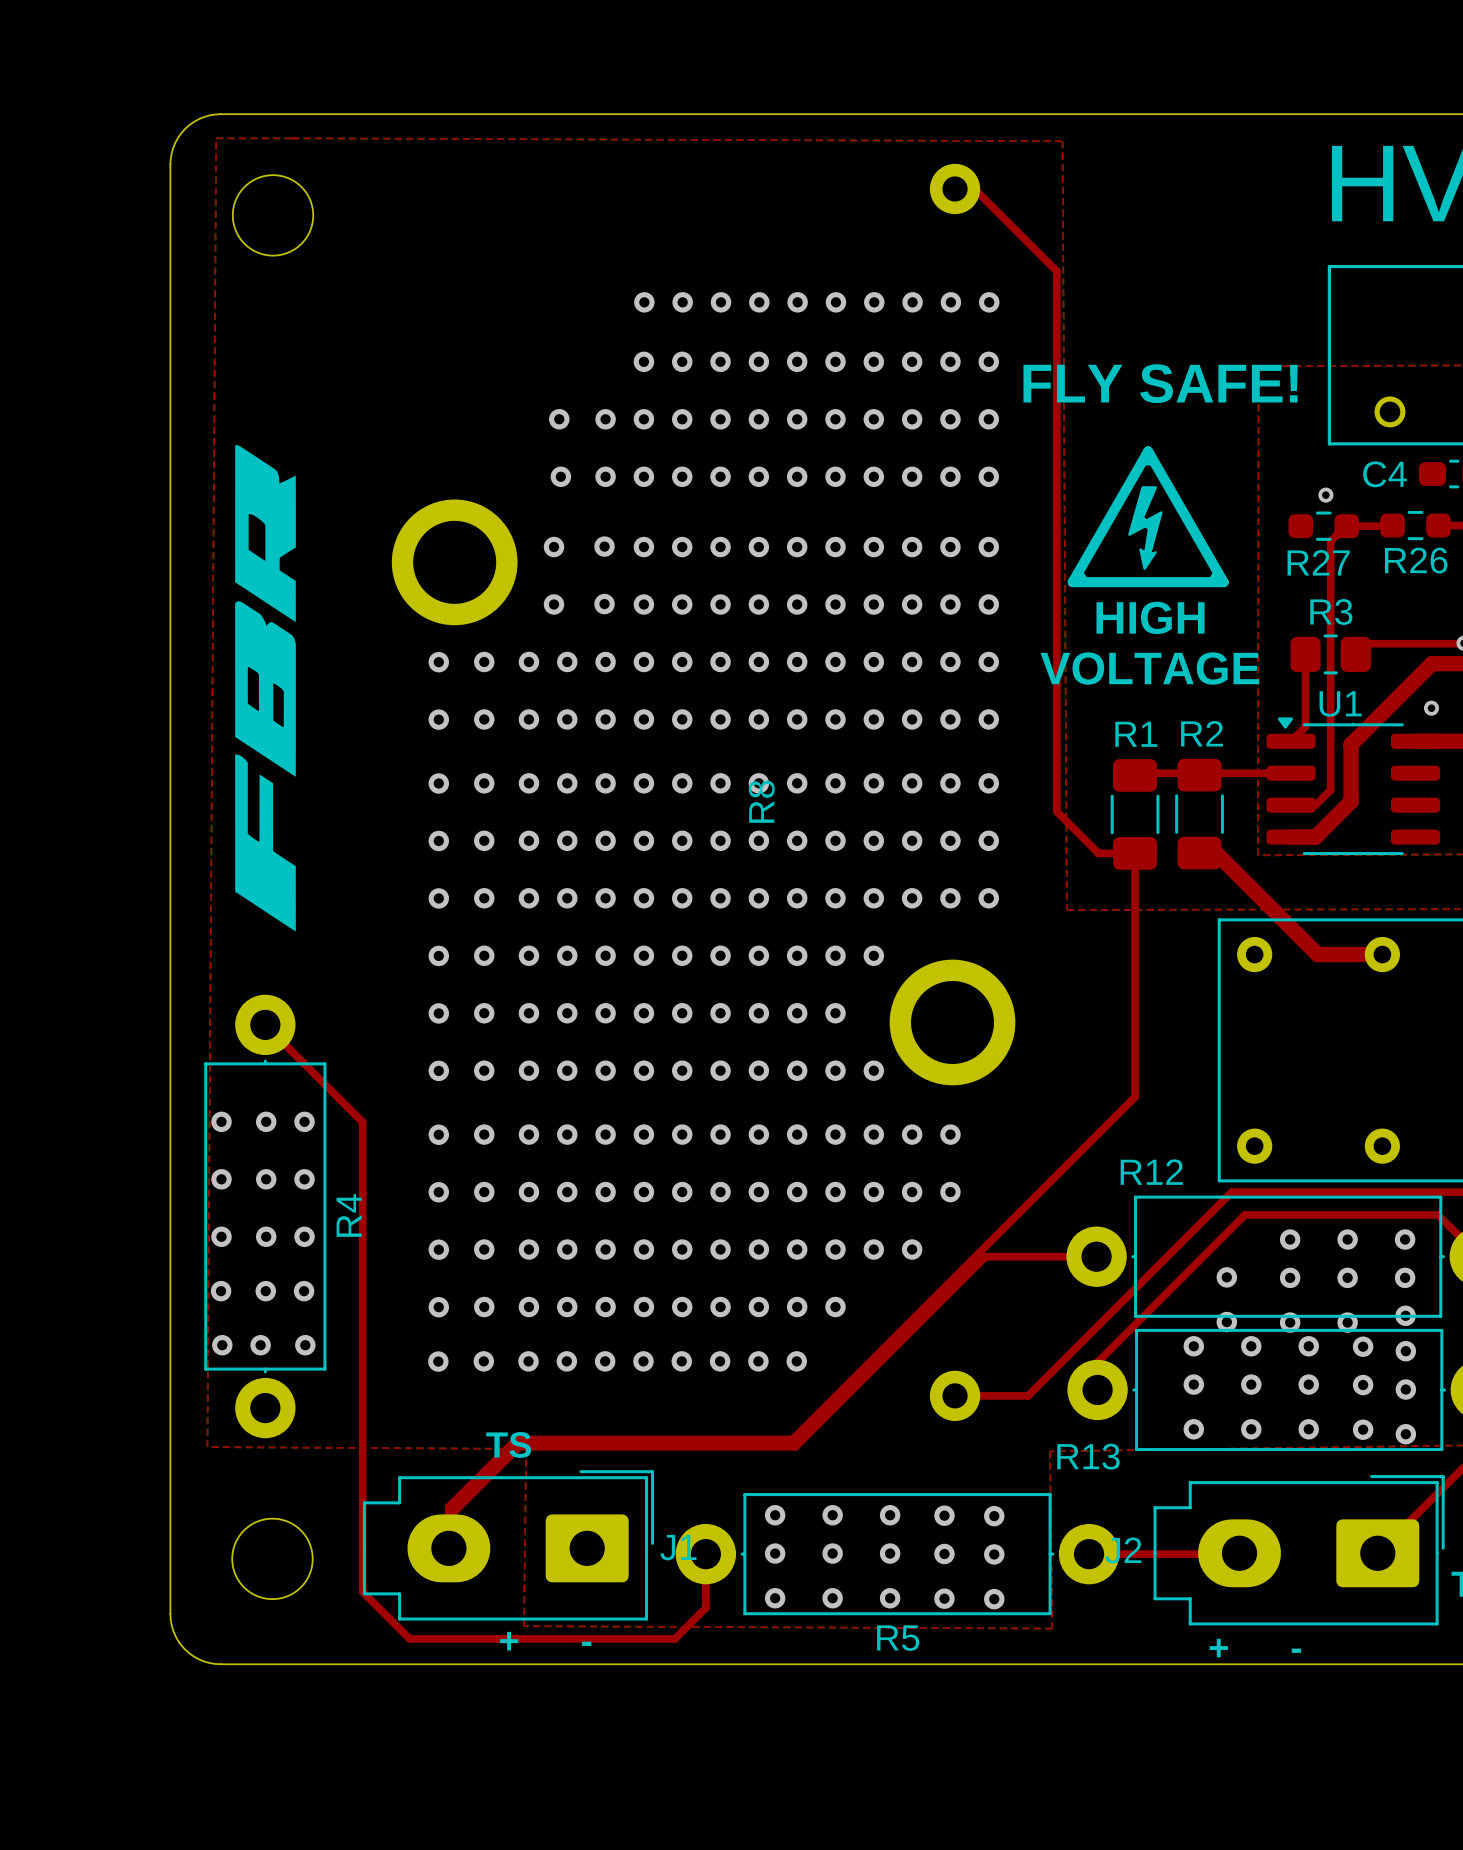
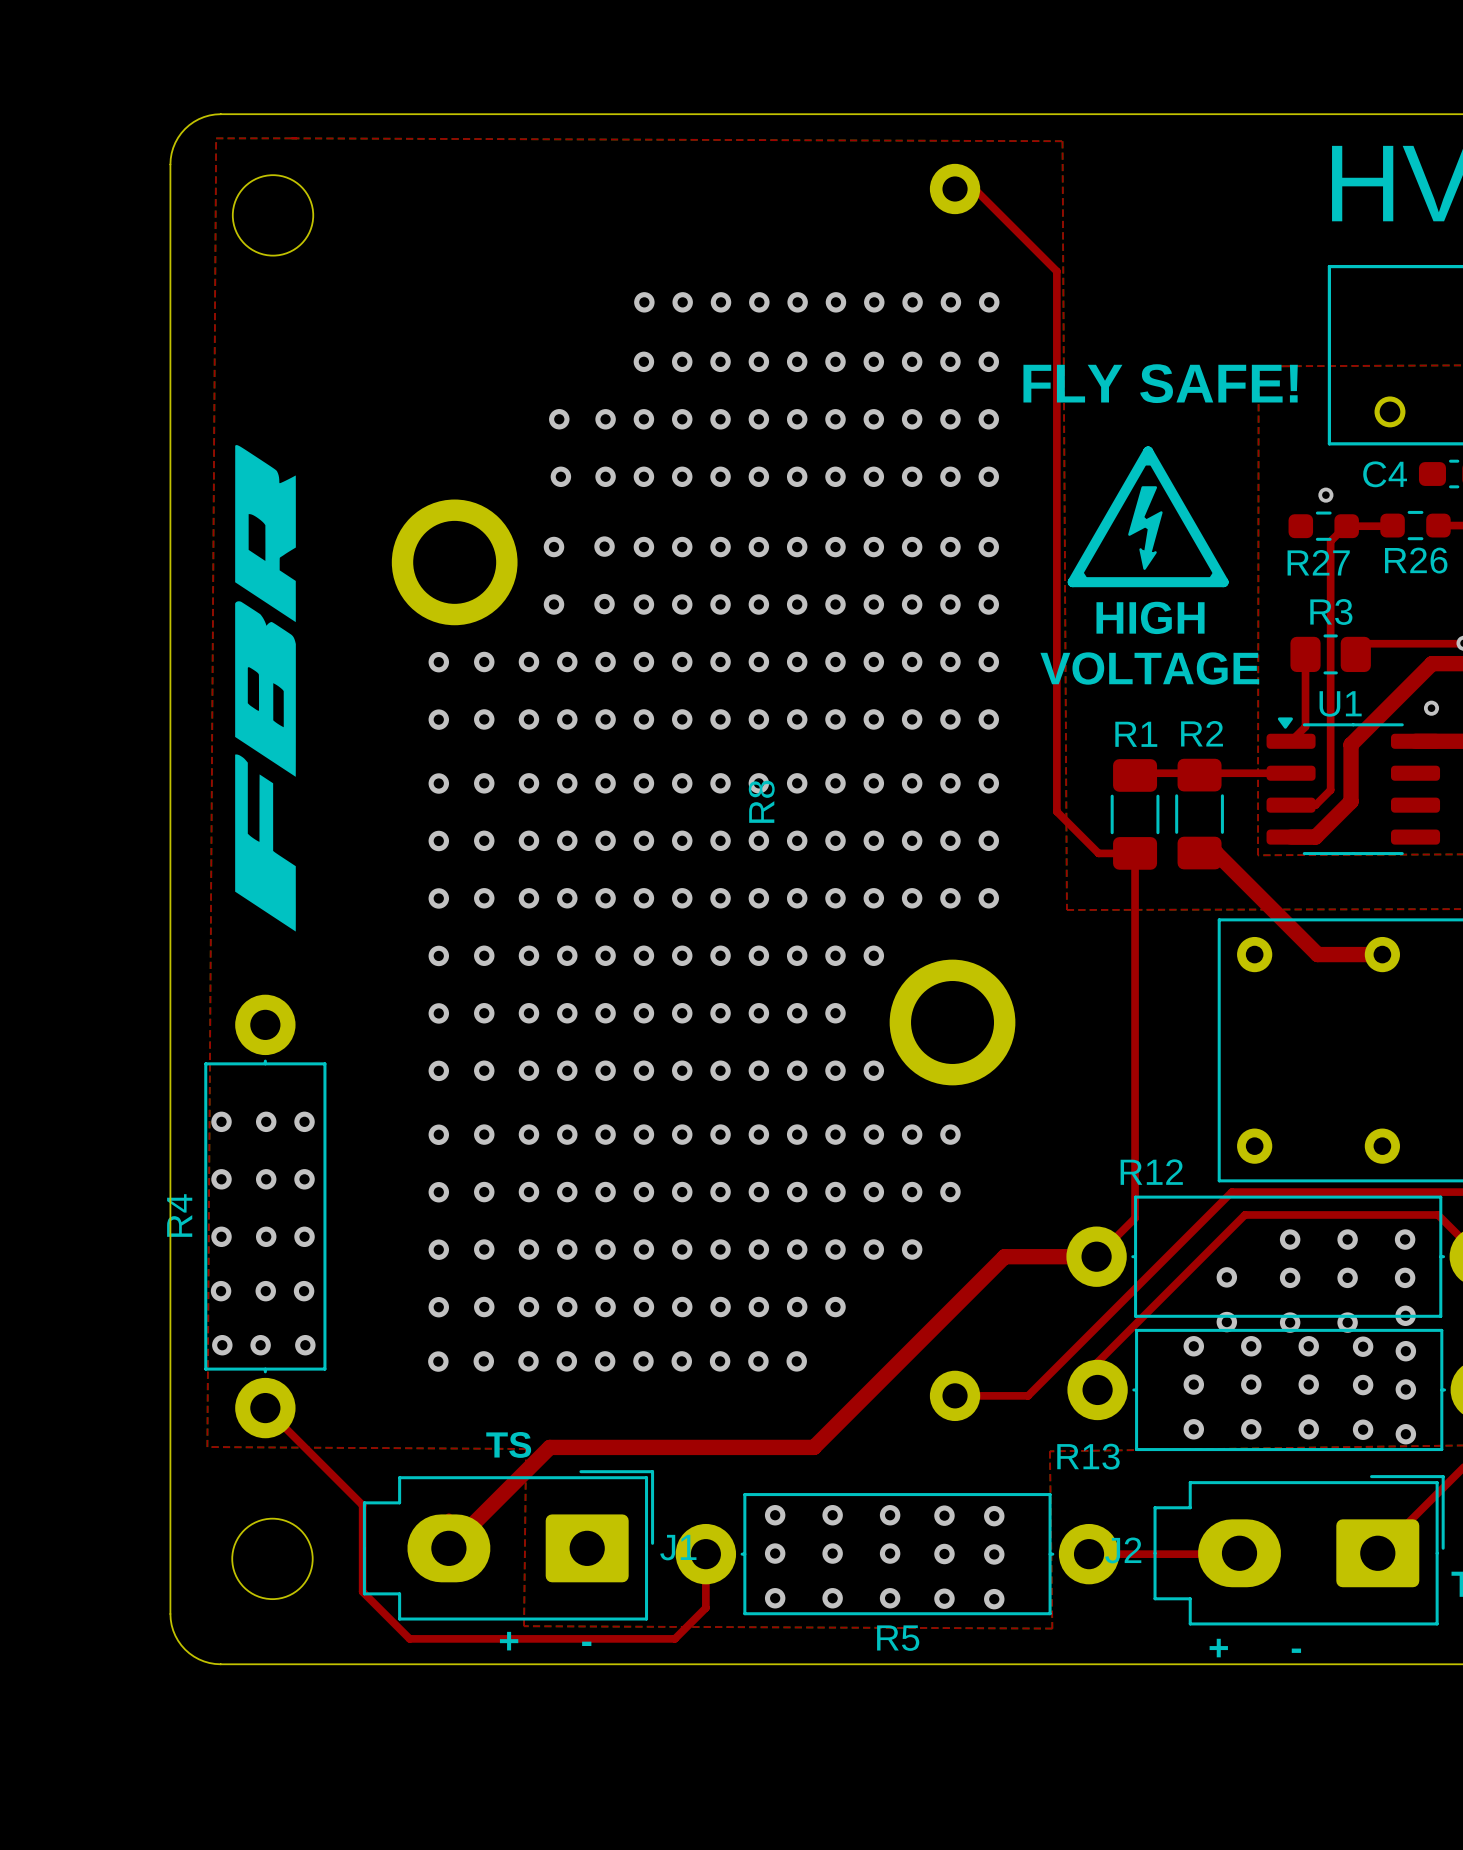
top track: (265, 1024) (362, 1122) (362, 1505) -> (265, 1408) (362, 1505)
top track: (1135, 1097) (792, 1439) (516, 1439) (448, 1506) (448, 1517) (519, 1446) (795, 1446) (985, 1256) (1004, 1256) -> (1135, 1097) (1135, 1218) (1096, 1256)
R4 name position: R4 (349, 1215) -> R4 (179, 1215)
top track: none -> (1004, 1256) (813, 1447) (549, 1447) (448, 1548)
top track width: thin (1004, 1256) (1096, 1256) -> thick (1004, 1256) (1096, 1256)

